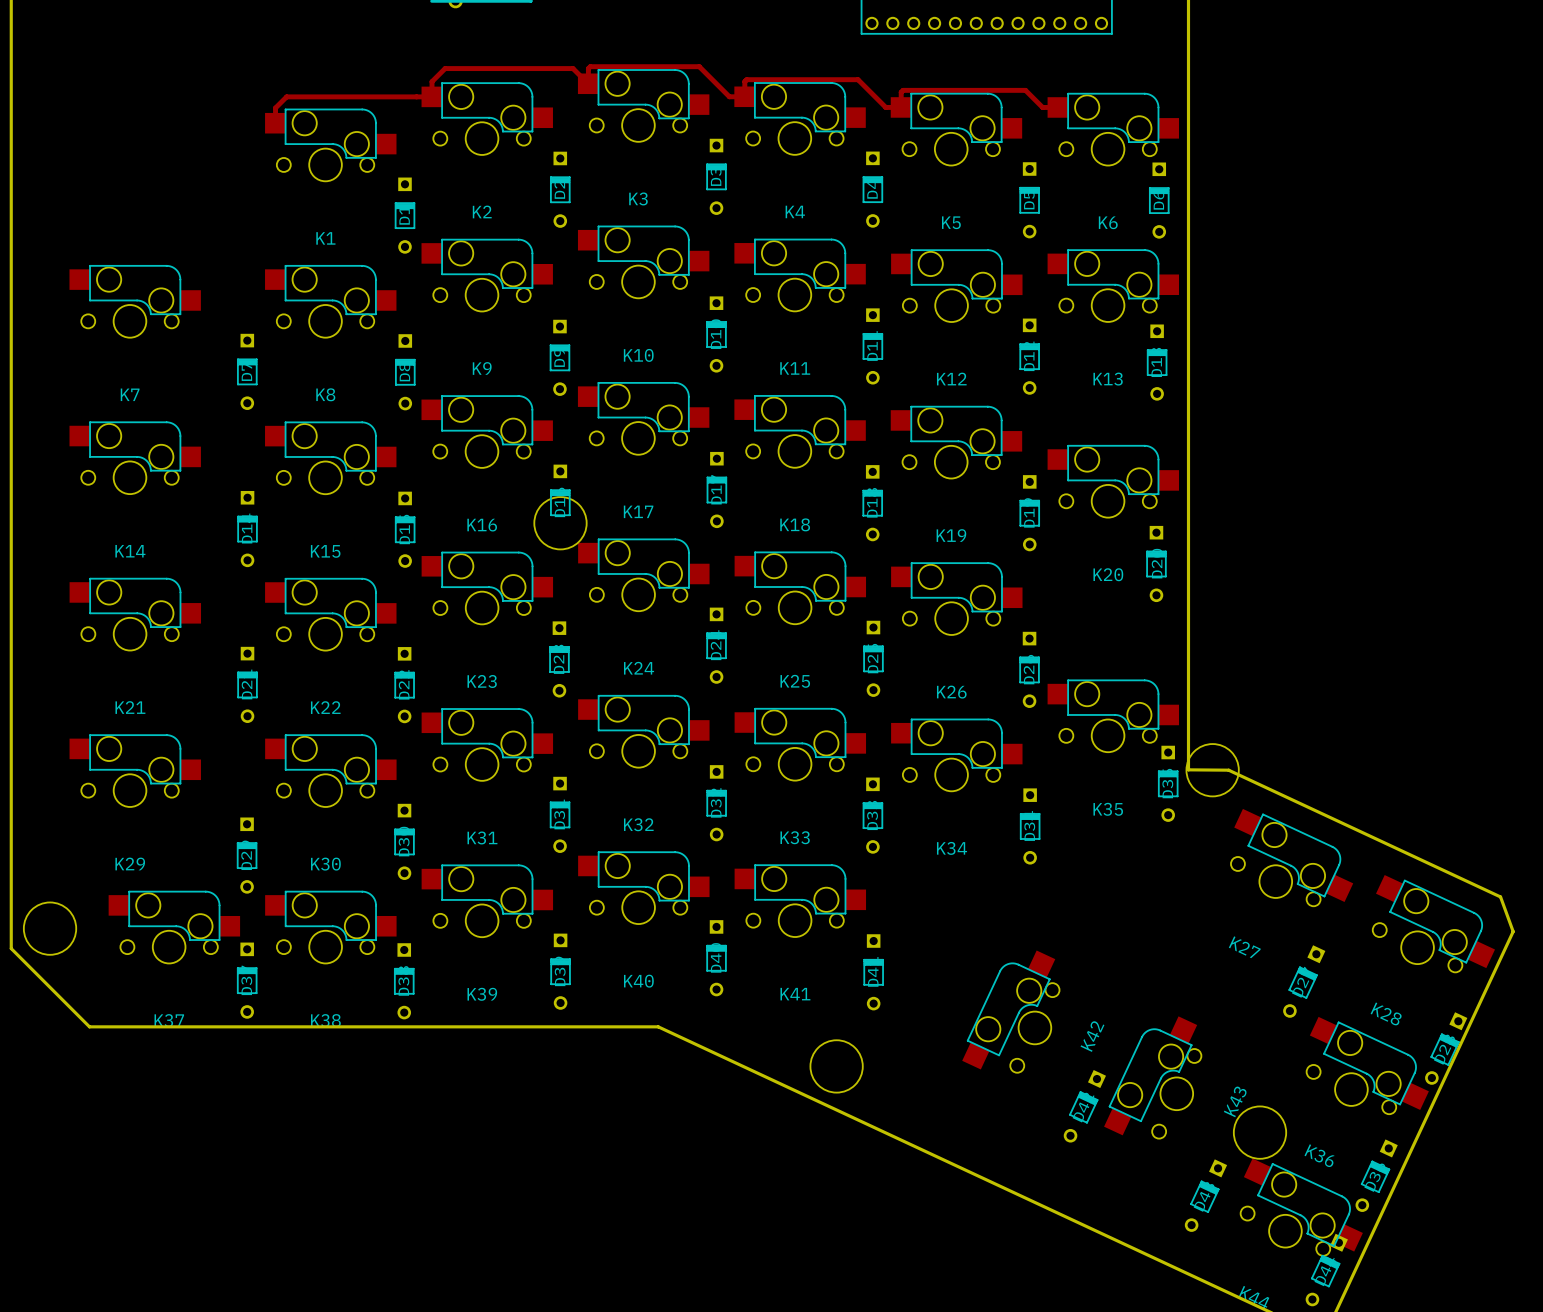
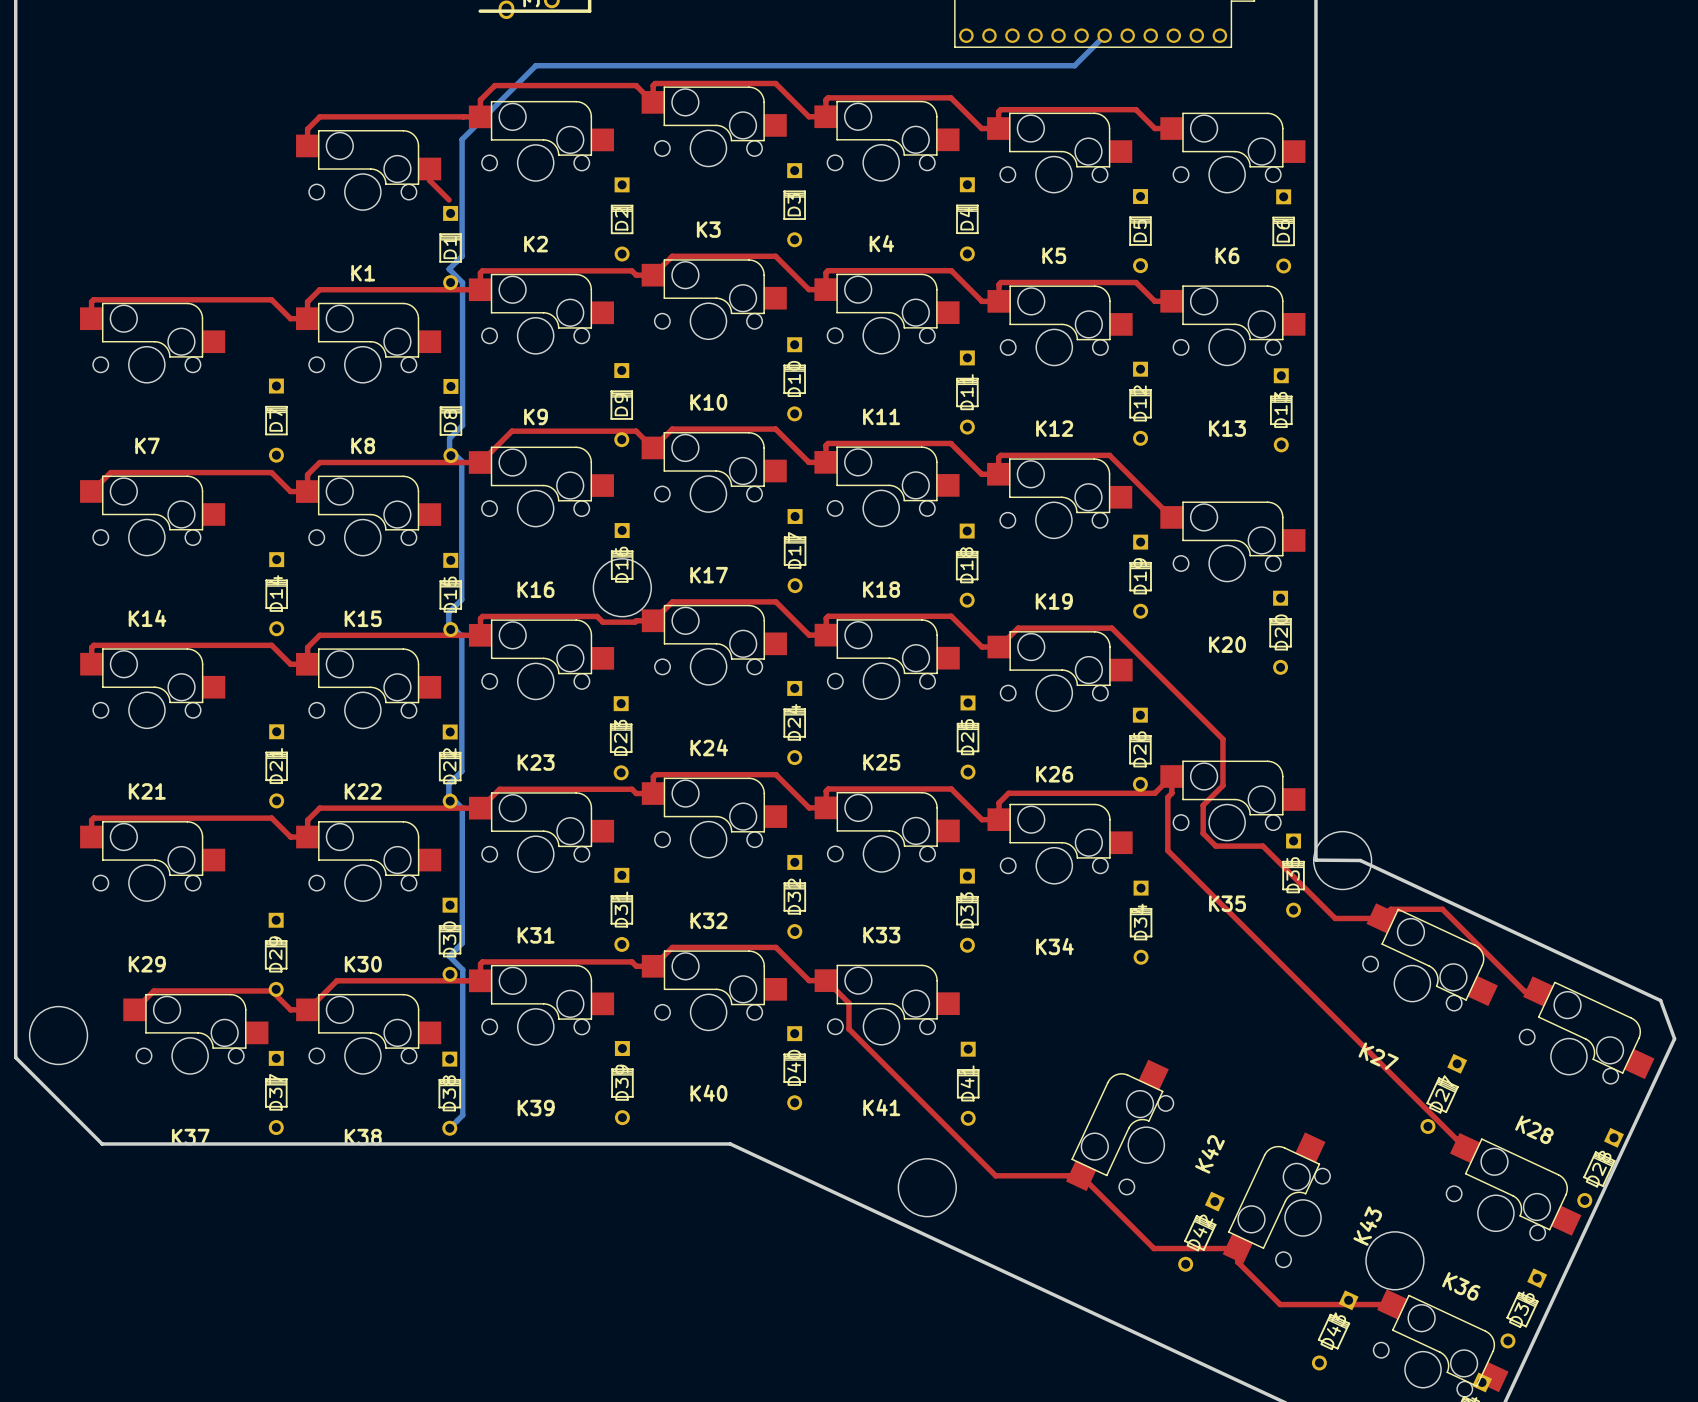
bottom track: none -> (1104, 35) (1074, 65) (535, 65) (462, 139) (462, 256) (449, 269) (462, 282) (462, 425) (449, 438) (449, 449) (461, 461) (461, 599) (448, 612) (448, 623) (461, 636) (461, 771) (448, 784) (448, 794) (462, 808) (462, 943) (449, 956) (462, 969) (462, 1115) (449, 1128)
top track: none -> (429, 169) (429, 180) (449, 200)
top track: none -> (1171, 301) (1154, 301) (1136, 282) (1001, 282) (999, 284) (999, 301) (982, 301) (951, 270) (828, 270) (825, 272) (825, 289) (808, 289) (775, 256) (672, 256) (653, 275) (636, 275) (631, 270) (482, 270) (480, 272) (480, 289) (319, 289) (307, 301) (307, 318) (290, 318) (271, 299) (93, 299) (91, 301) (91, 318)
top track: none -> (91, 491) (110, 472) (271, 472) (290, 491) (307, 491) (307, 474) (319, 462) (480, 462) (511, 431) (636, 431) (653, 447) (672, 429) (775, 429) (808, 462) (825, 462) (825, 445) (828, 443) (950, 443) (981, 474) (998, 474) (998, 457) (1000, 455) (1109, 455) (1171, 517)
top track: none -> (91, 664) (91, 647) (93, 645) (271, 645) (290, 664) (307, 664) (307, 647) (319, 635) (480, 635) (480, 618) (482, 616) (597, 616) (602, 622) (653, 620) (672, 601) (775, 601) (809, 635) (826, 635) (826, 618) (828, 616) (951, 616) (982, 647) (999, 647) (1018, 628) (1111, 628) (1222, 739) (1222, 785) (1203, 805) (1203, 833) (1215, 846) (1262, 846) (1335, 918) (1381, 918) (1390, 909) (1442, 909) (1524, 991) (1538, 991)
top track: none -> (91, 837) (91, 820) (93, 818) (271, 818) (290, 837) (307, 837) (307, 820) (319, 808) (480, 808) (499, 789) (632, 789) (636, 793) (653, 793) (653, 776) (655, 774) (775, 774) (809, 807) (826, 807) (826, 791) (828, 789) (951, 789) (982, 819) (999, 819) (999, 802) (1008, 793) (1154, 793) (1171, 776) (1171, 793) (1167, 797) (1167, 850) (1465, 1148)
top track: none -> (134, 1009) (153, 990) (271, 990) (290, 1009) (307, 1009) (336, 980) (480, 980) (480, 964) (482, 961) (632, 961) (636, 966) (653, 966) (672, 947) (775, 947) (809, 980) (826, 980) (848, 1003) (848, 1029) (995, 1175) (1081, 1175) (1153, 1248) (1237, 1248) (1237, 1262) (1280, 1304) (1392, 1304)

